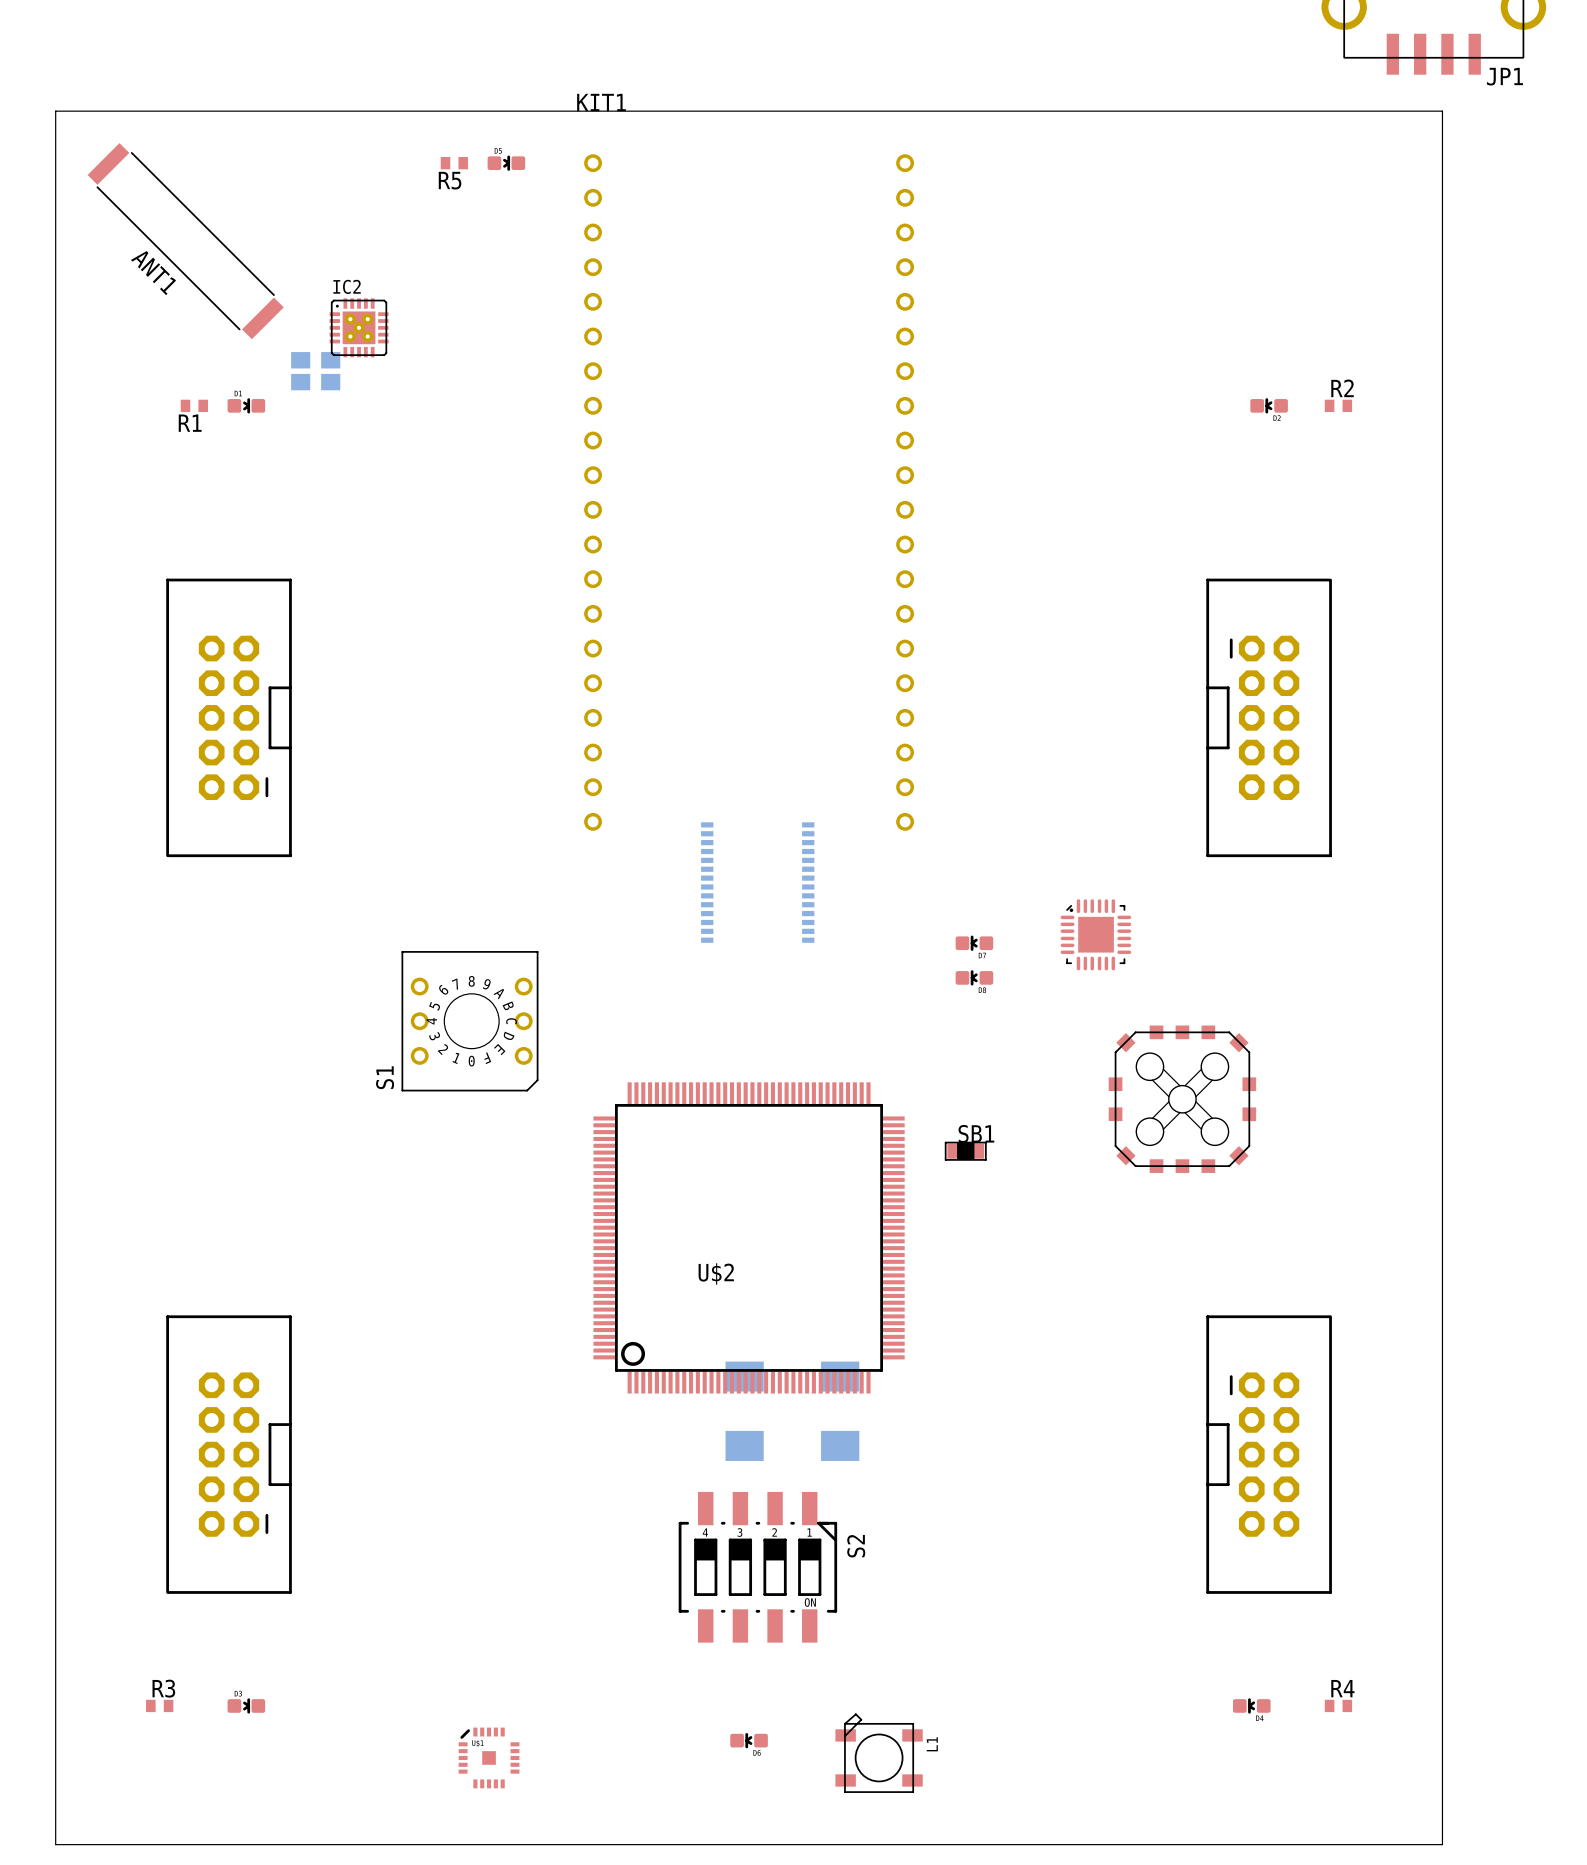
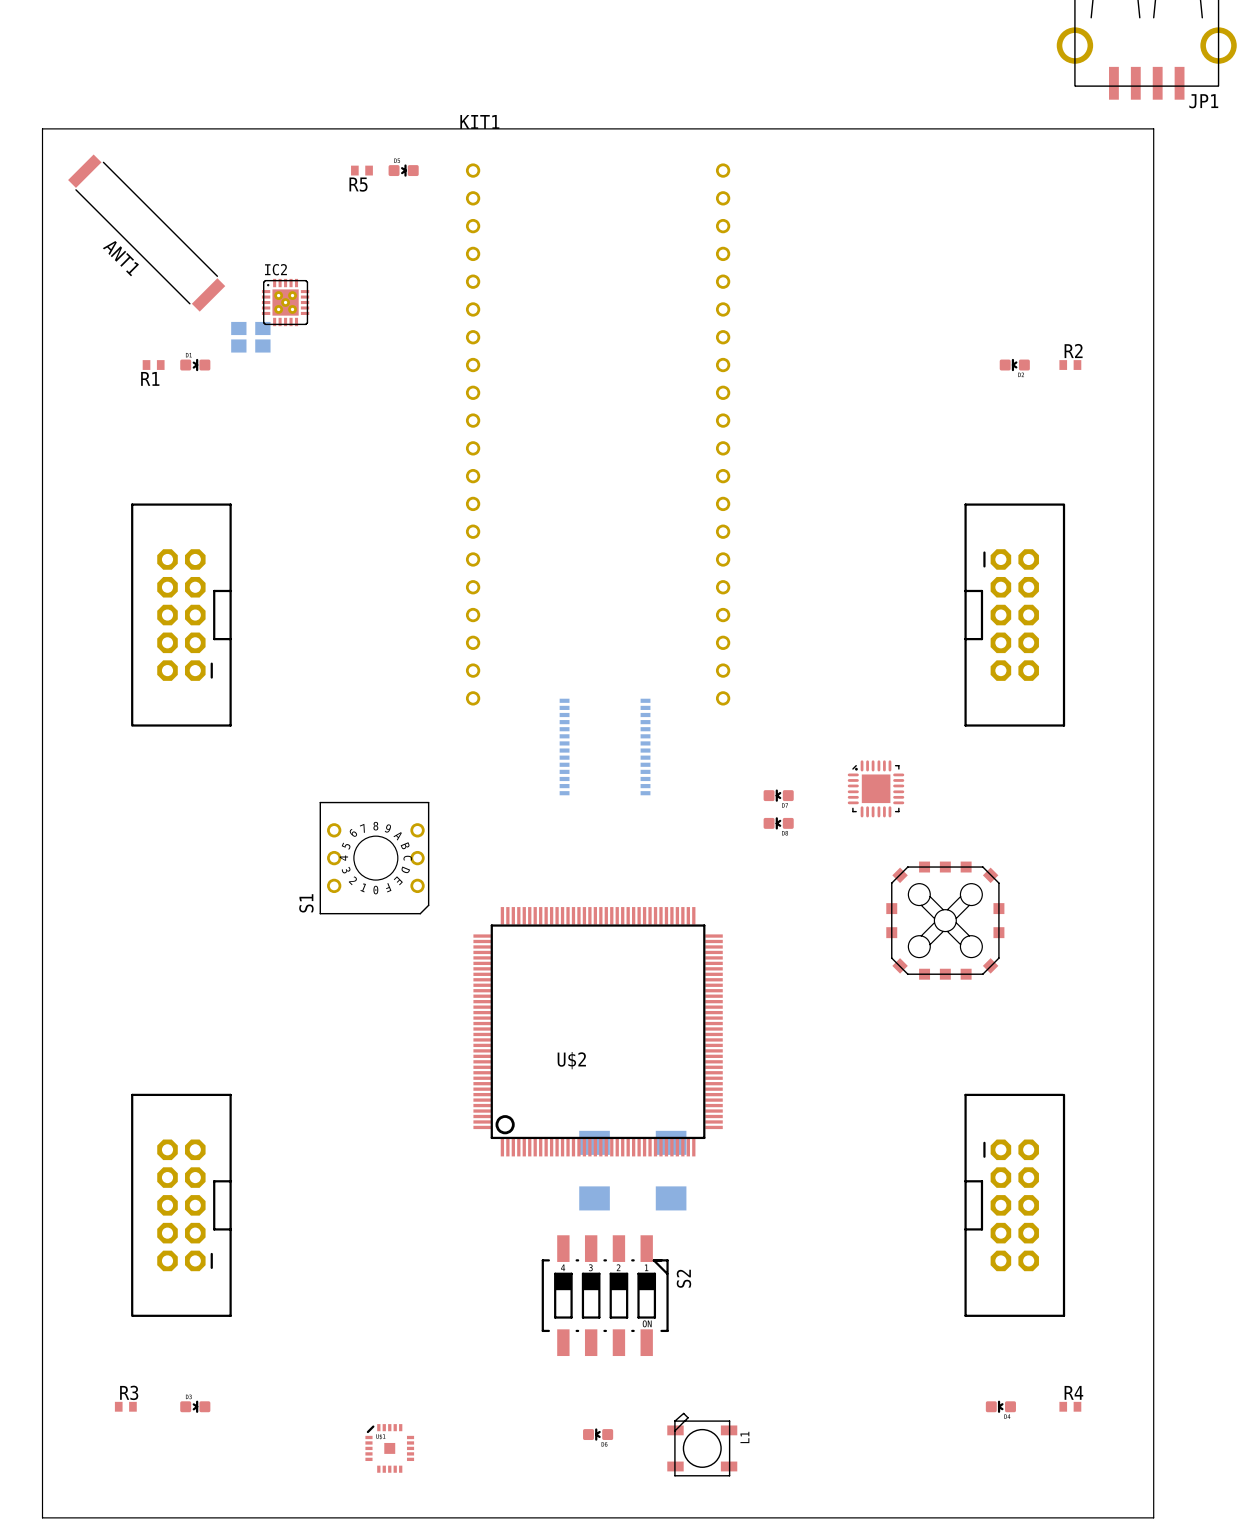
SB1: (965, 1151) -> none

